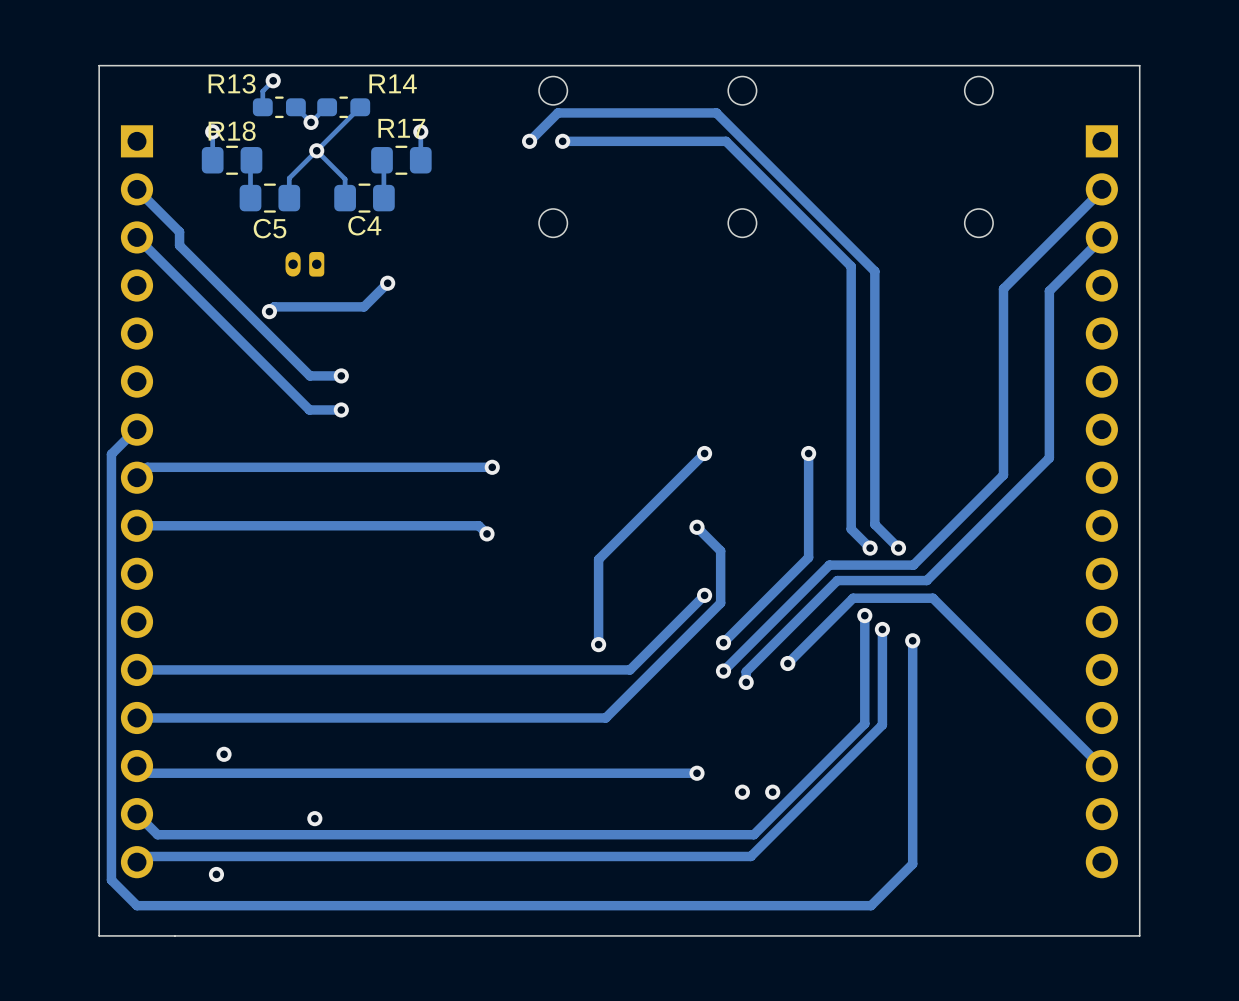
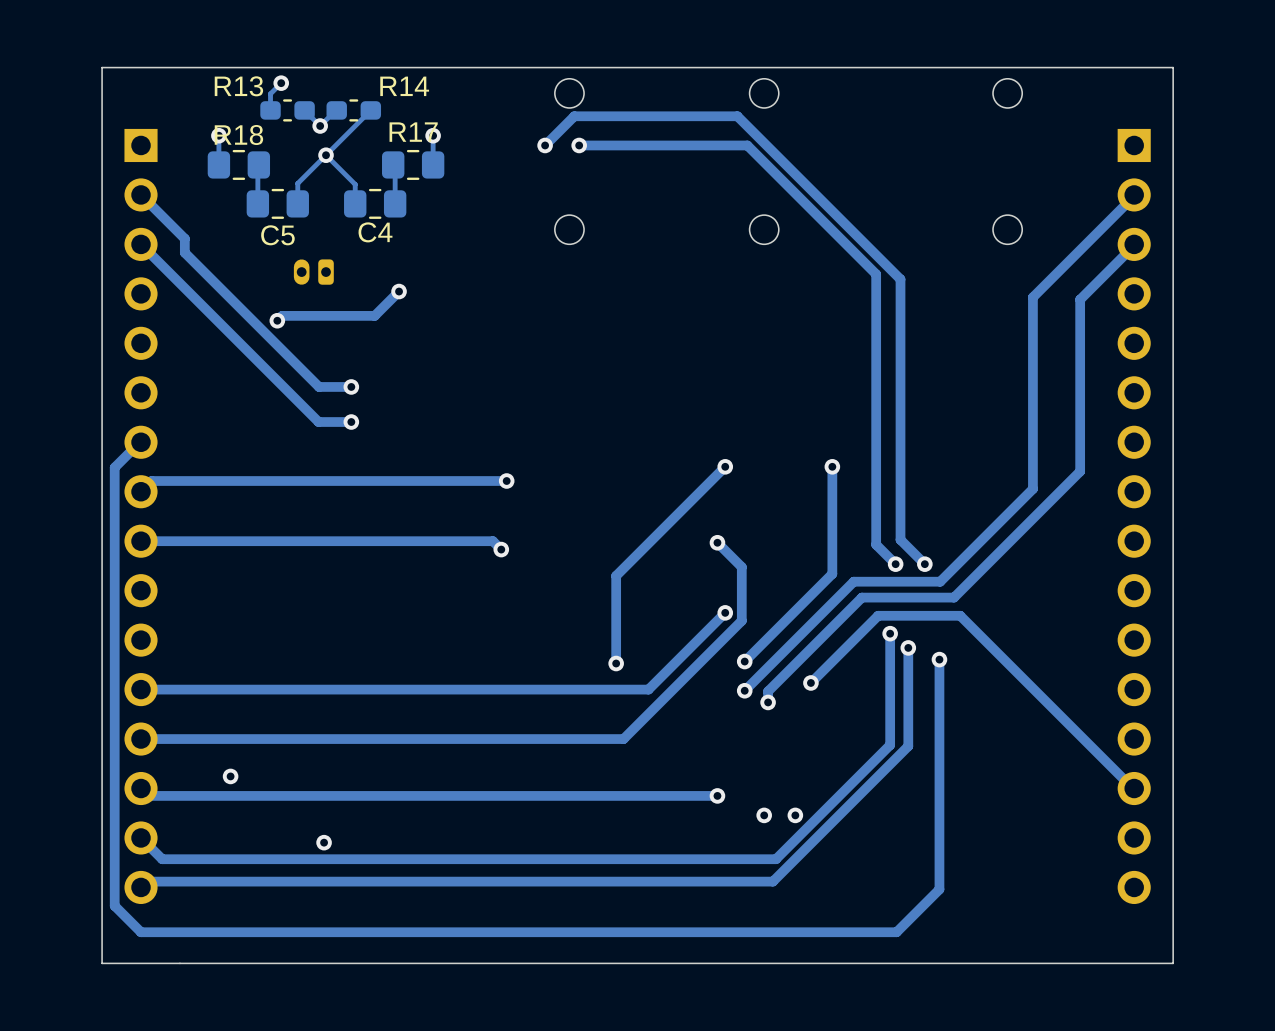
via: (216, 874) -> none

